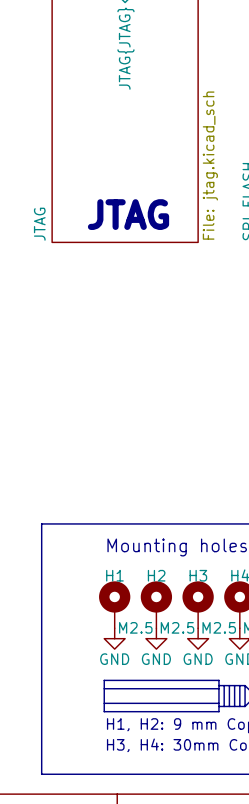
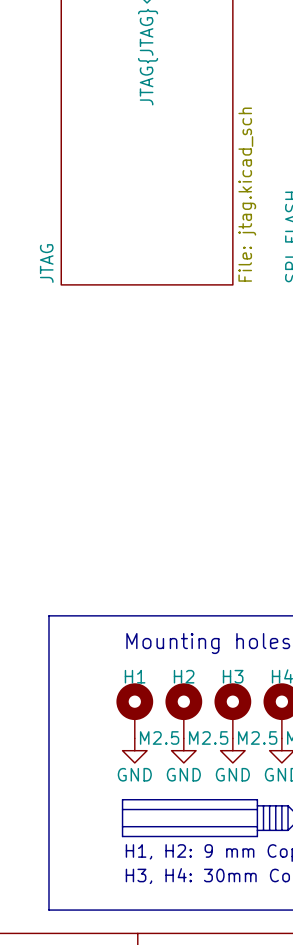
text: JTAG (128, 214) -> none

